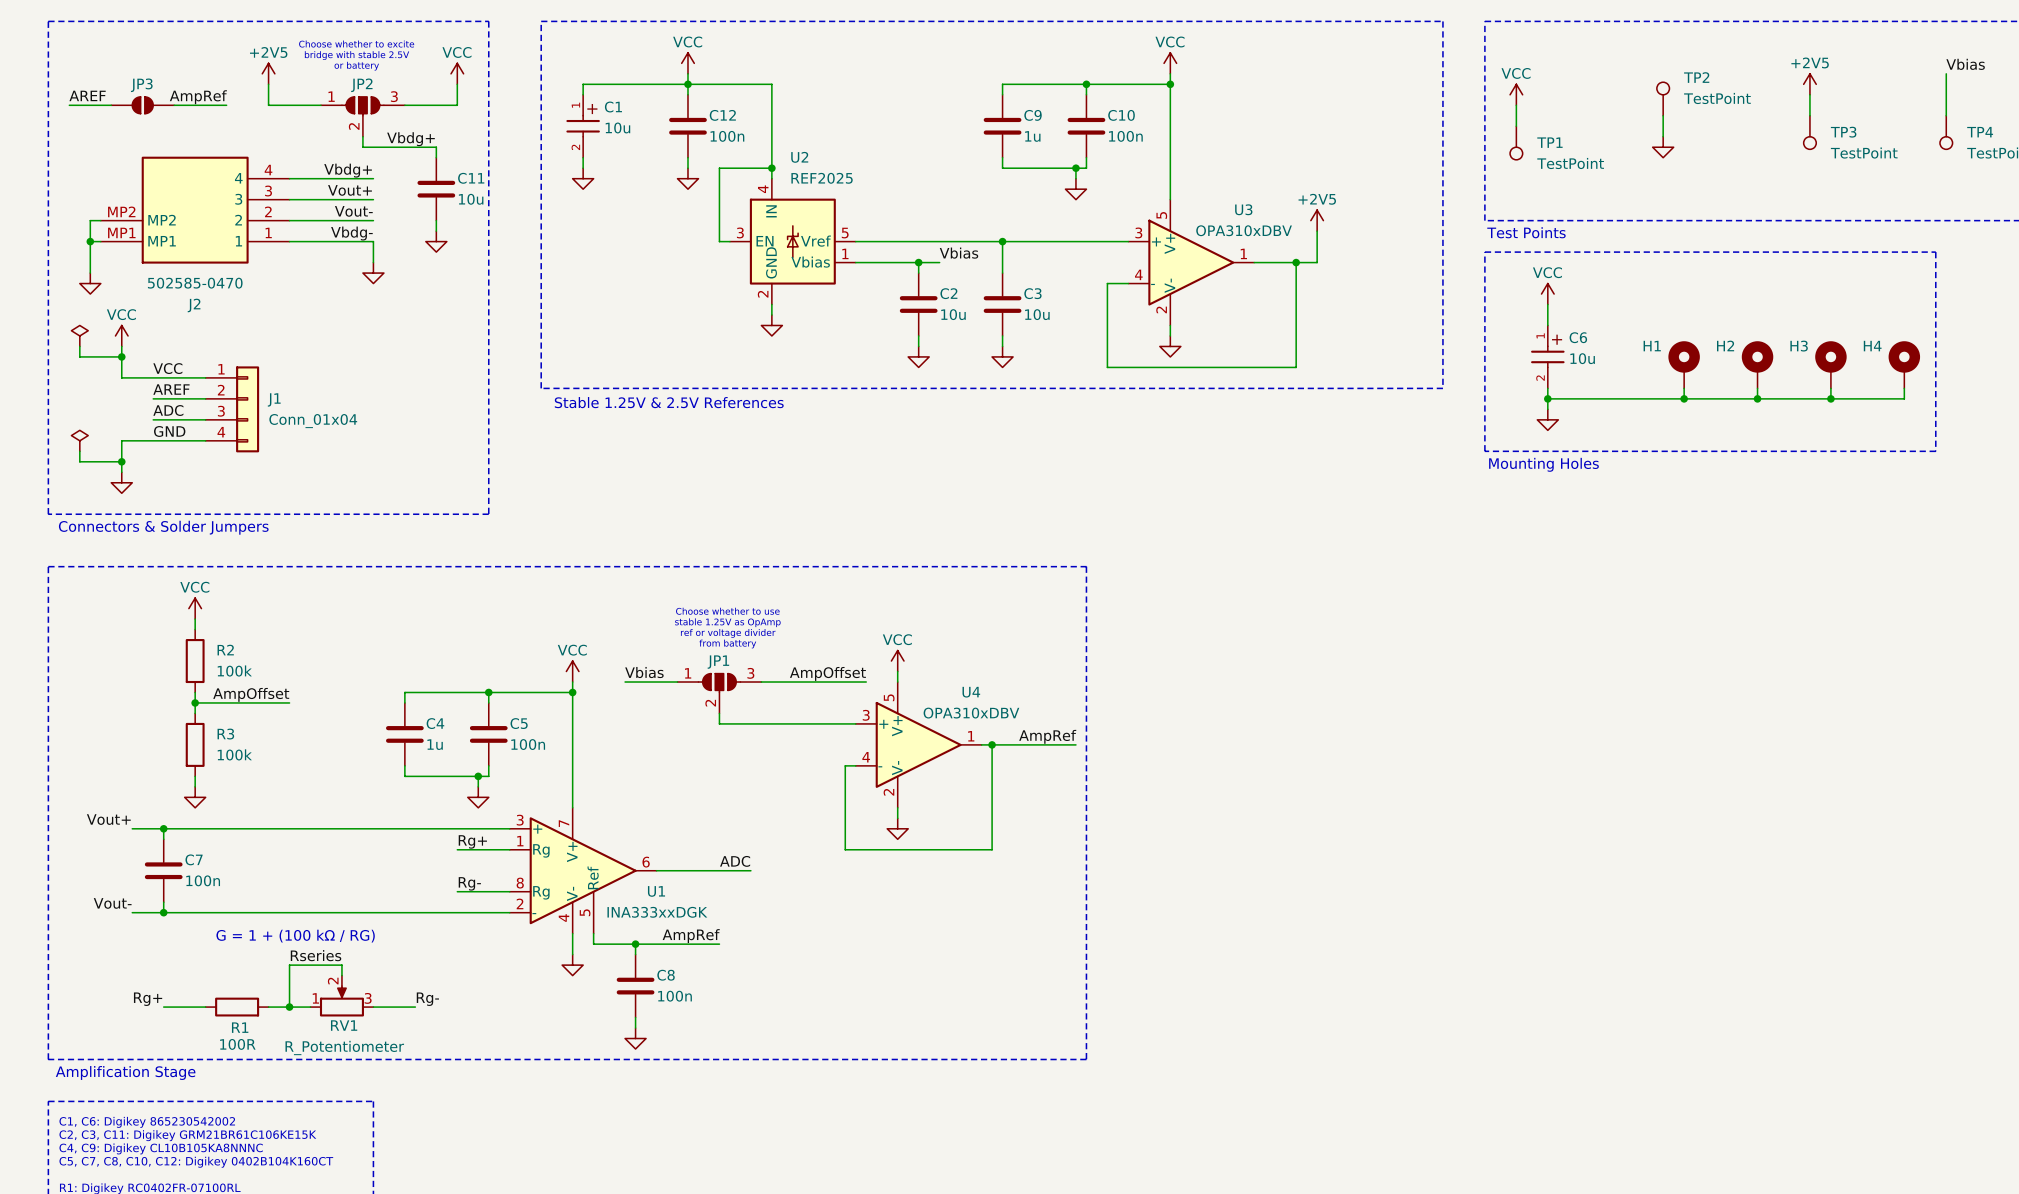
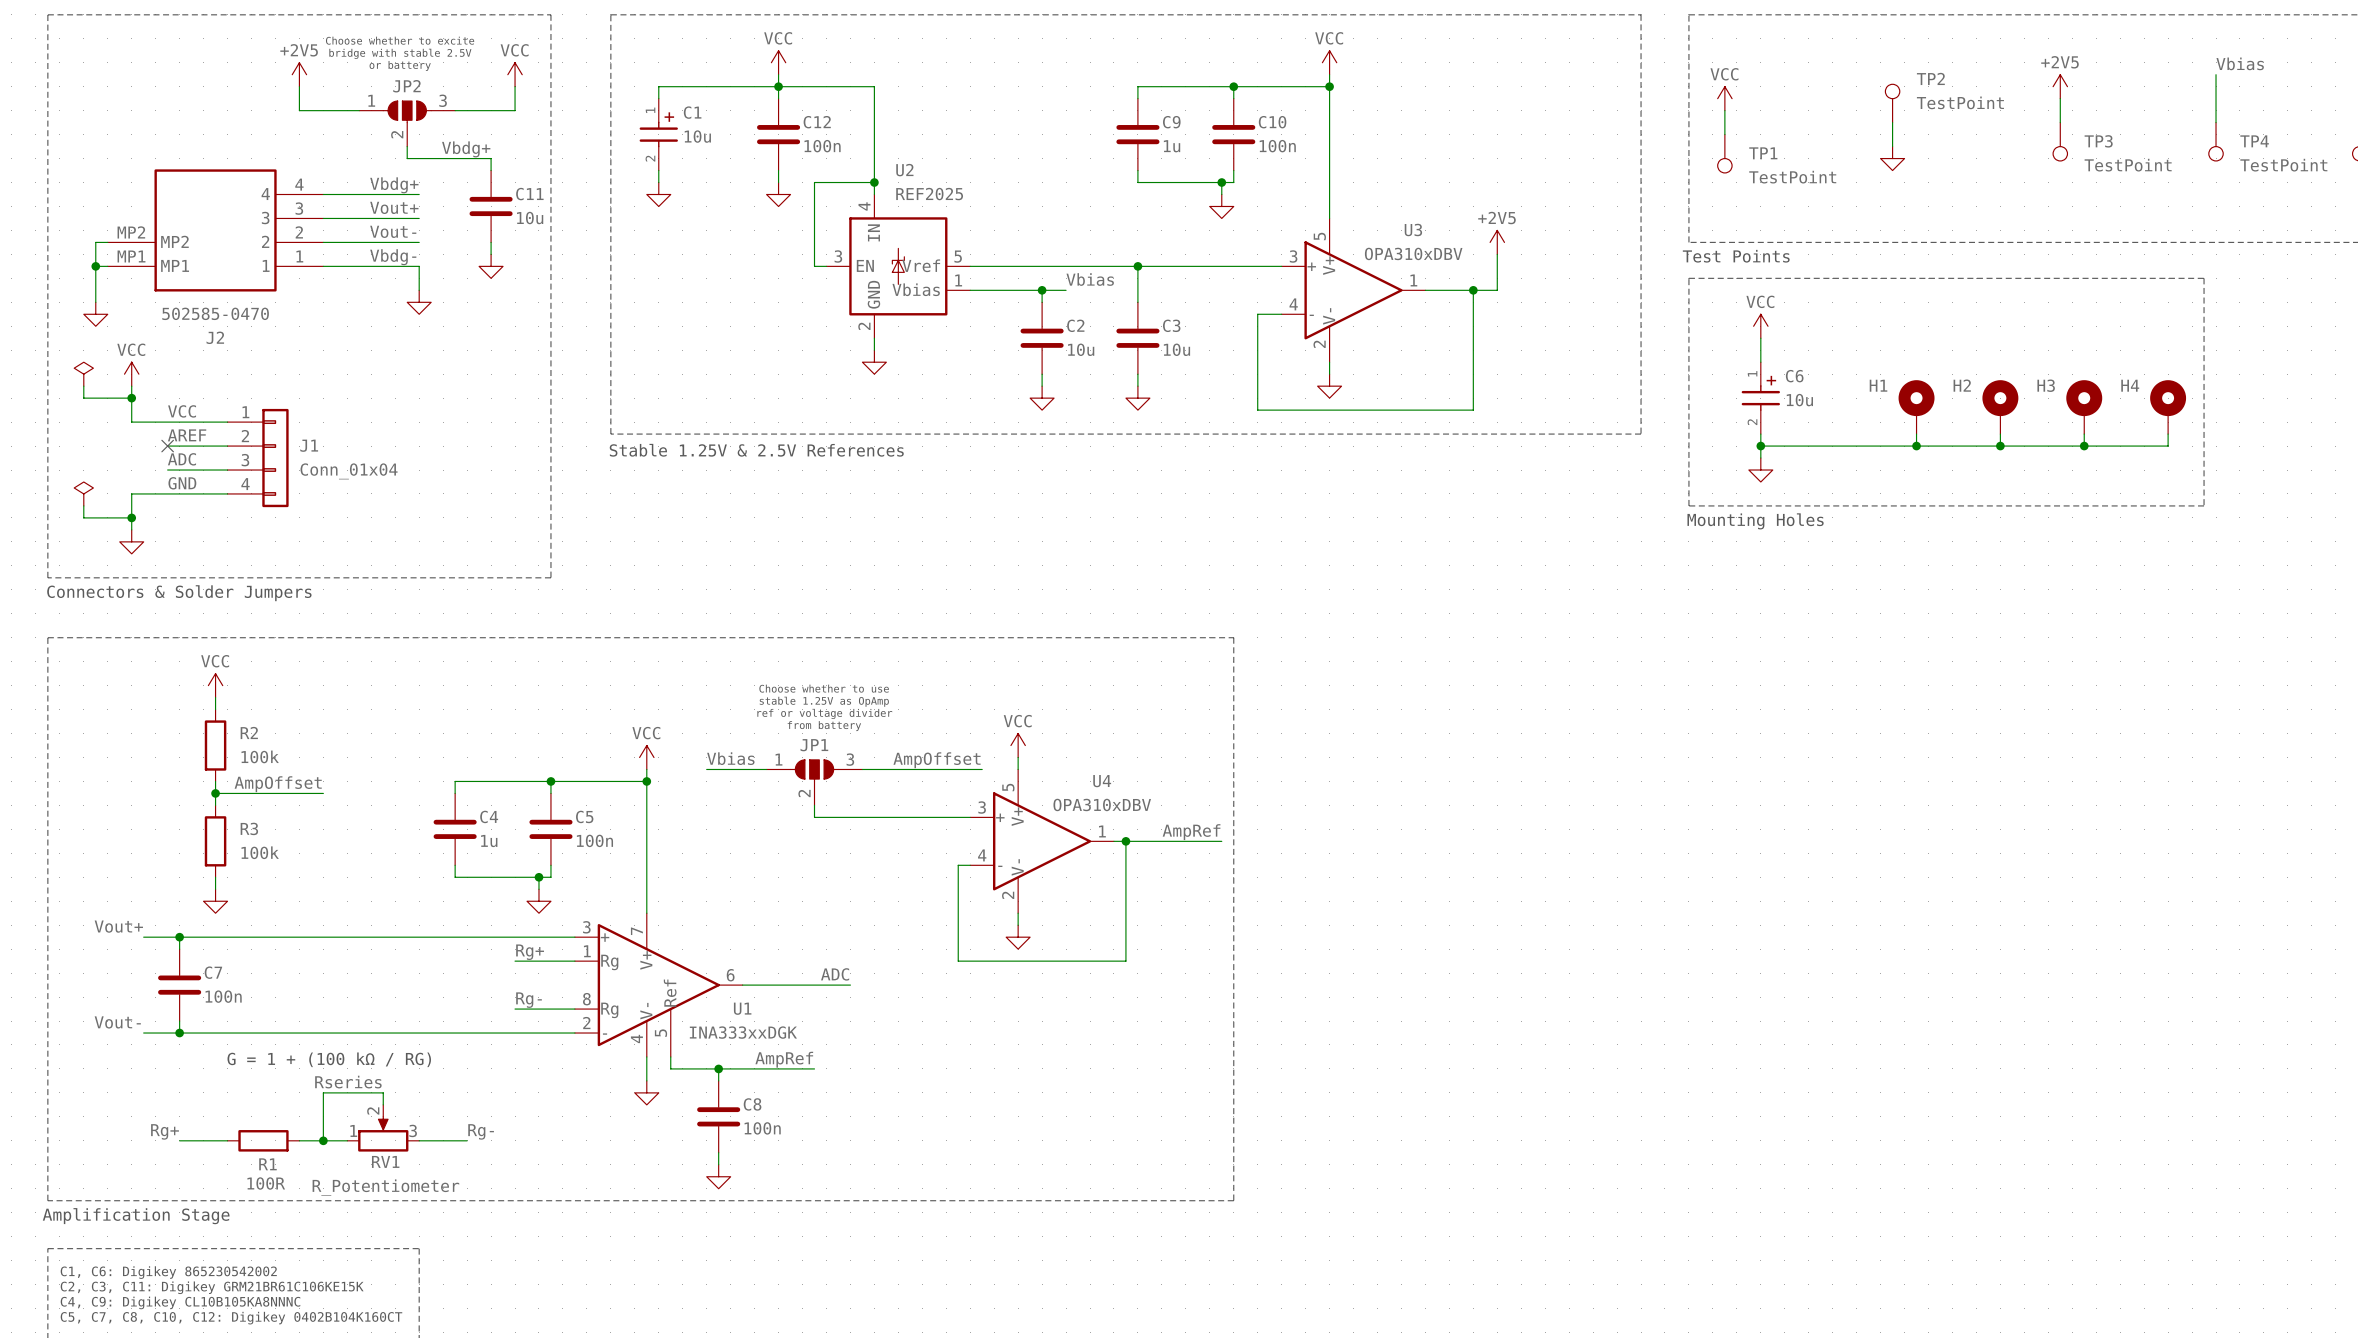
label: AREF (87, 95) -> none
label: AmpRef (198, 97) -> none
wire: (69, 105) (111, 105) -> none
JP3: (142, 105) -> none
wire: (174, 105) (226, 105) -> none
no-connect mark: none -> (167, 446)

